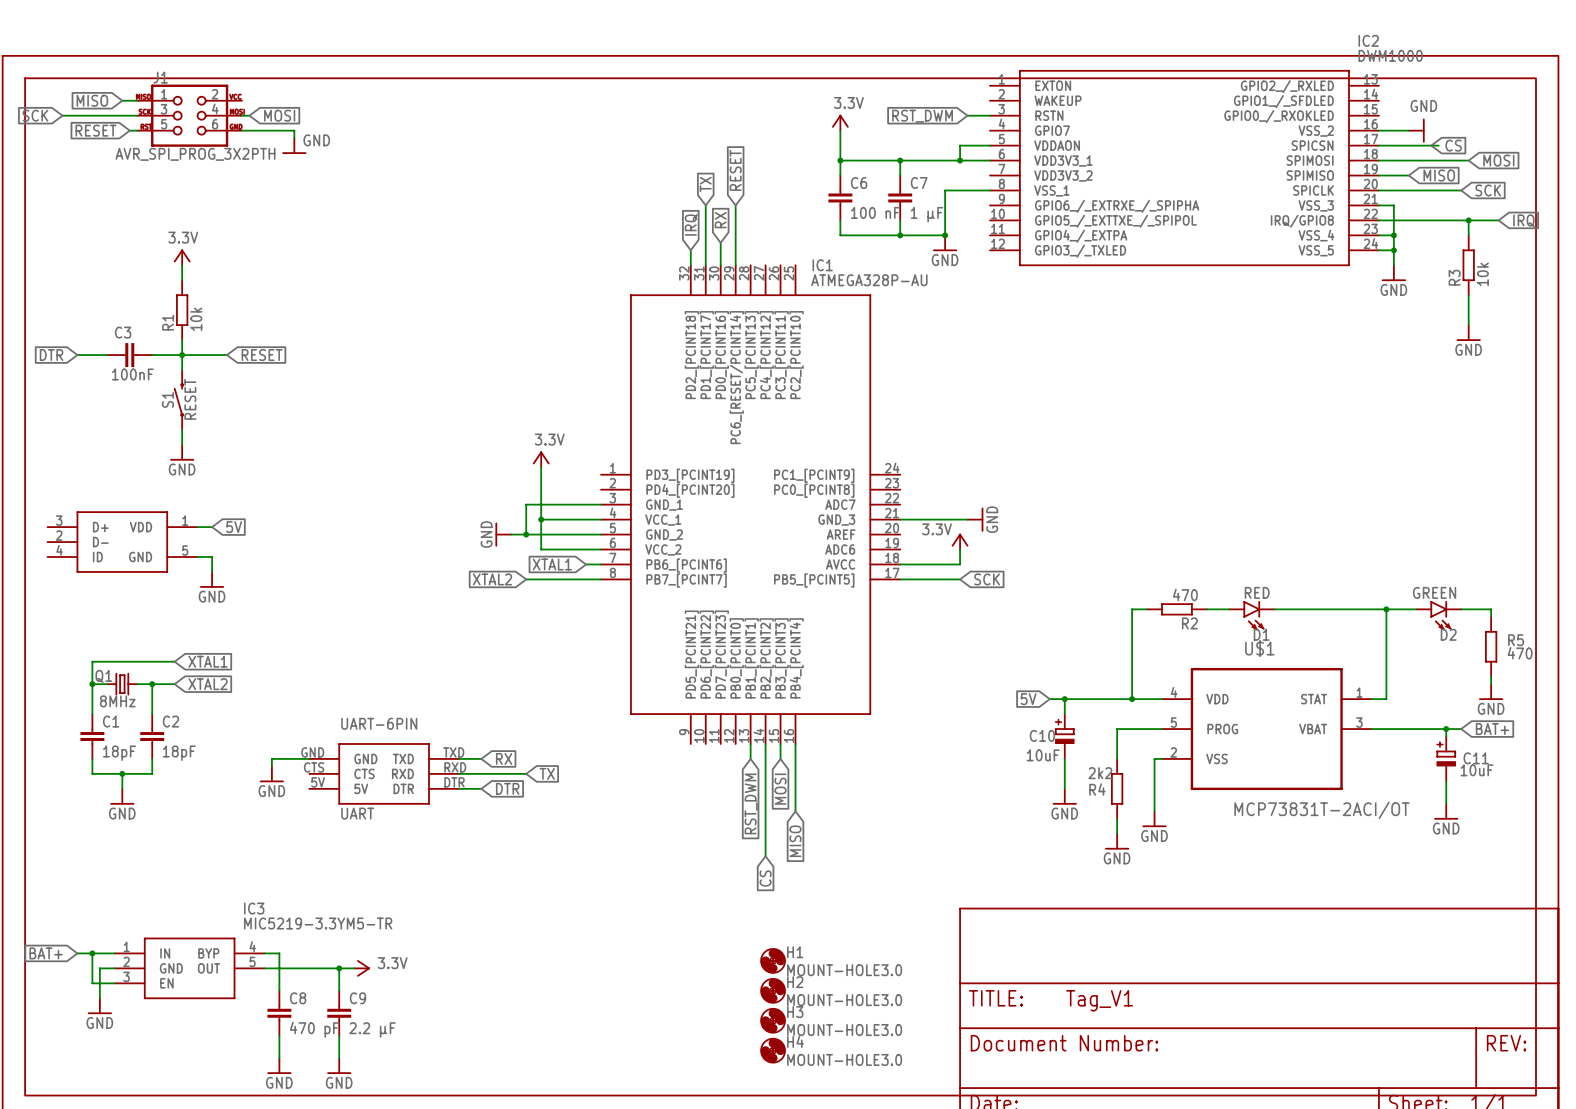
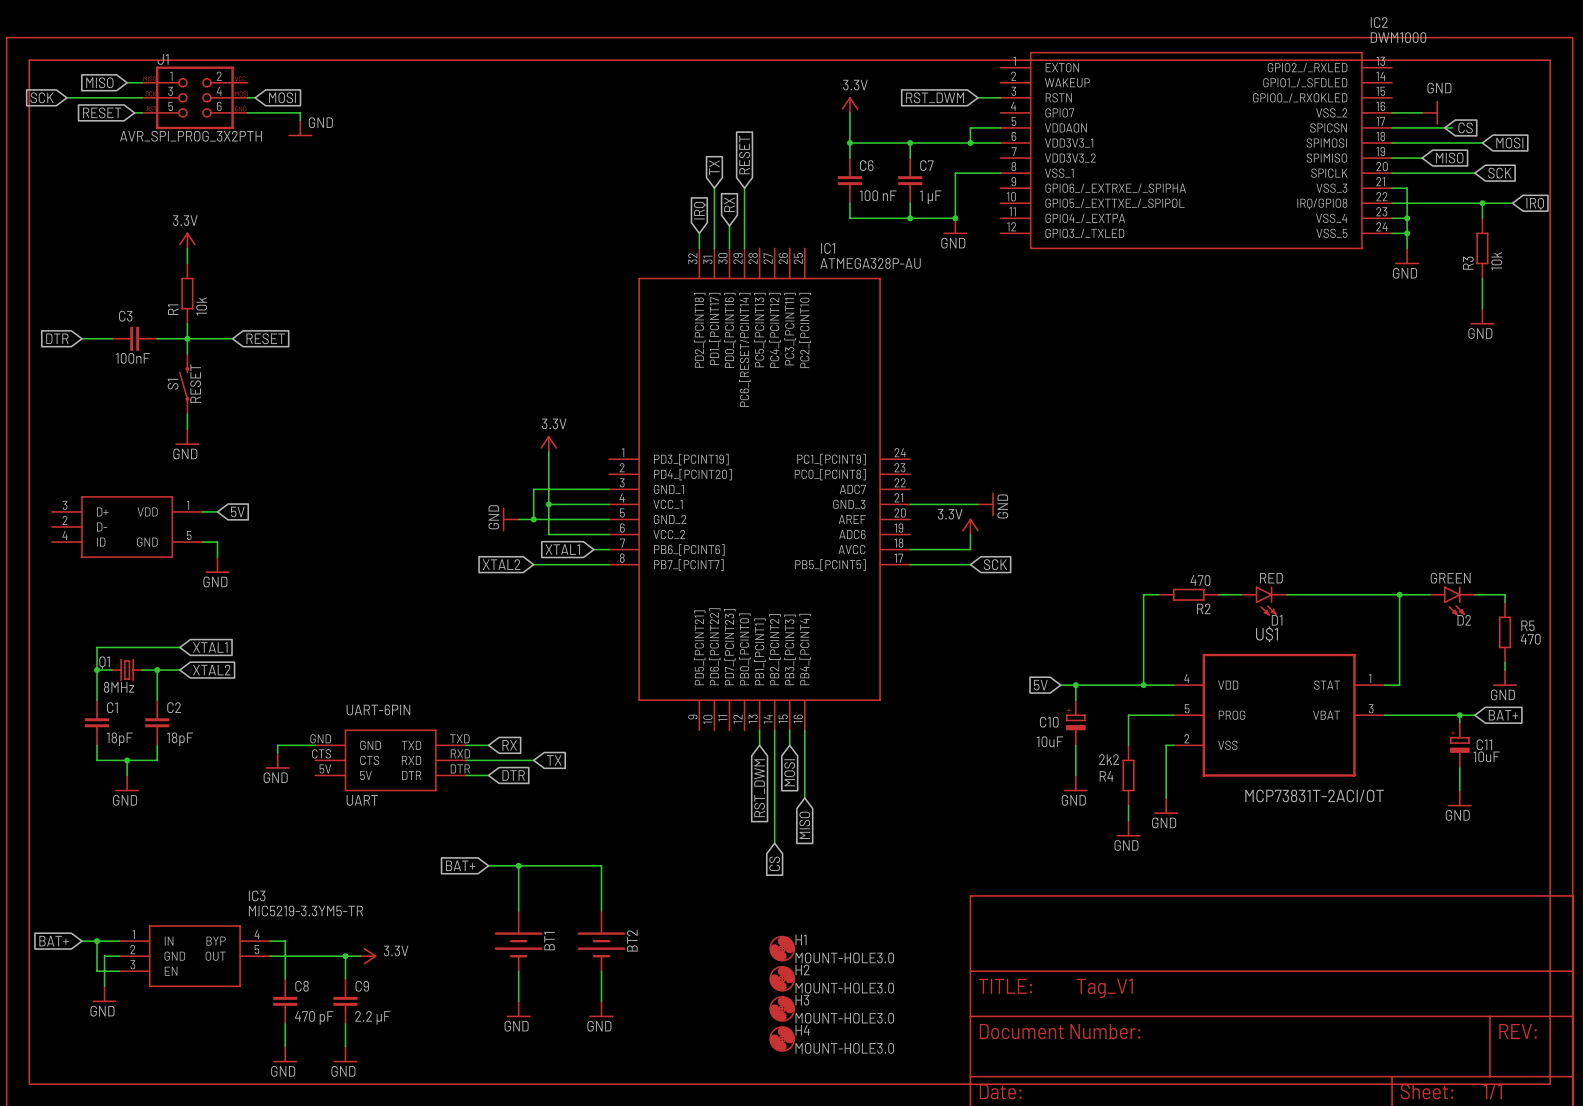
global label: none -> BAT+ (460, 865)
wire: none -> (488, 865) (601, 865) (601, 911)
wire: none -> (518, 865) (518, 911)
junction: none -> (518, 865)
BT1: none -> (518, 941)
BT2: none -> (601, 941)
wire: none -> (518, 971) (518, 1001)
wire: none -> (601, 971) (601, 1001)
power symbol: none -> GND (518, 1009)
power symbol: none -> GND (601, 1009)

